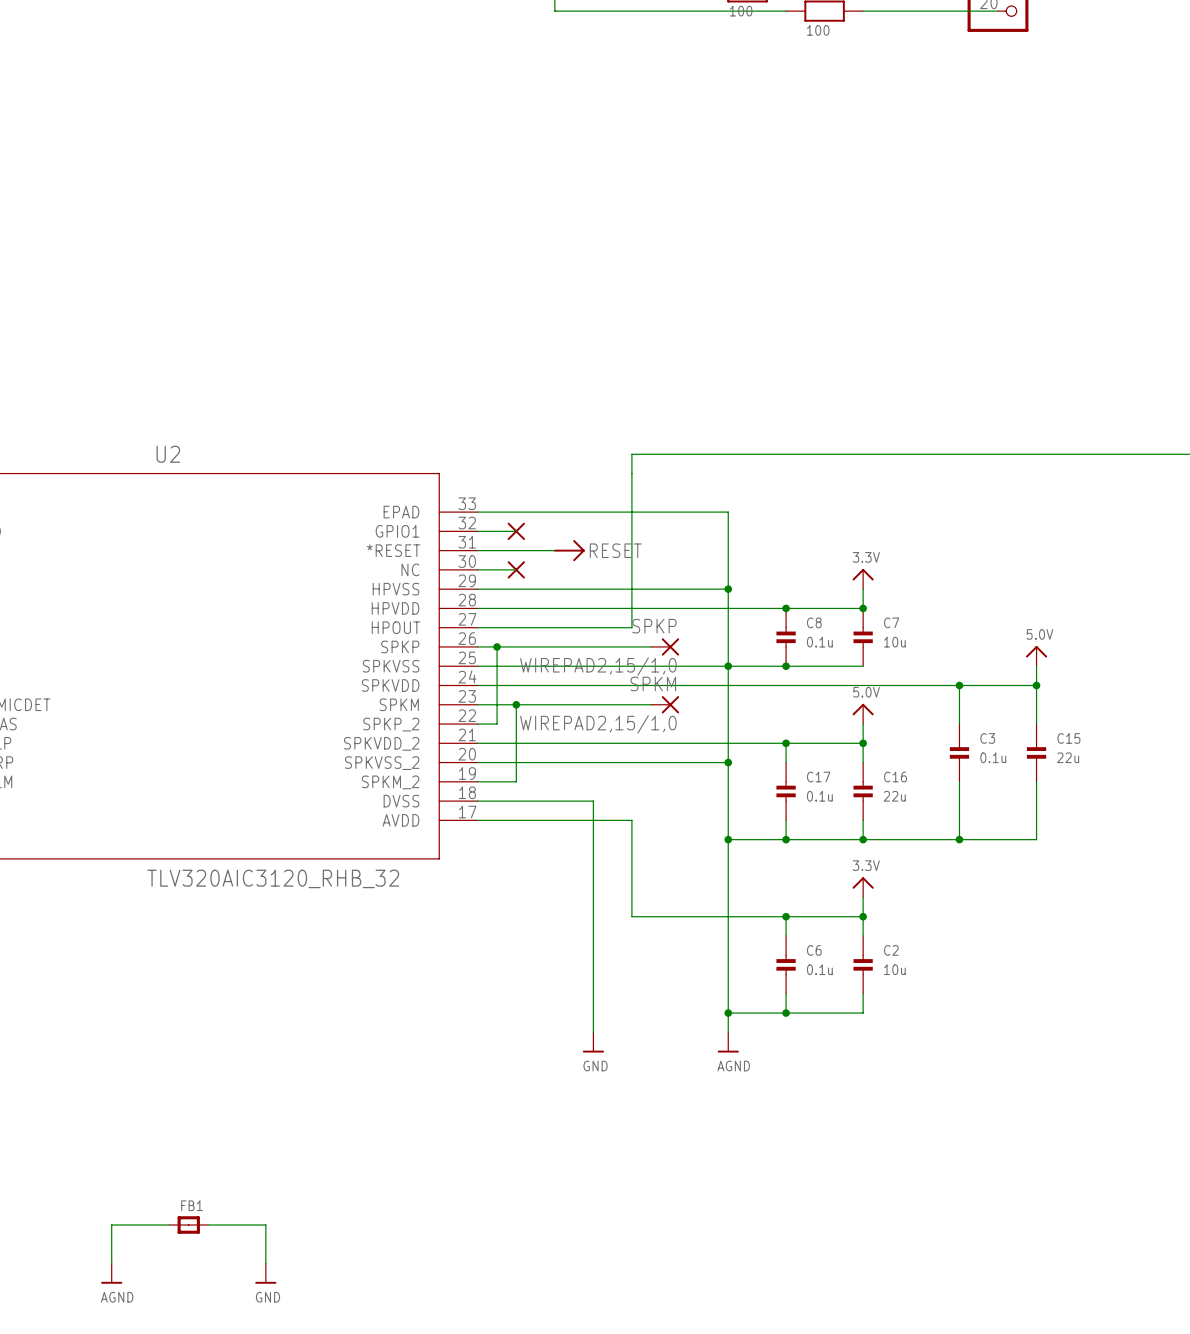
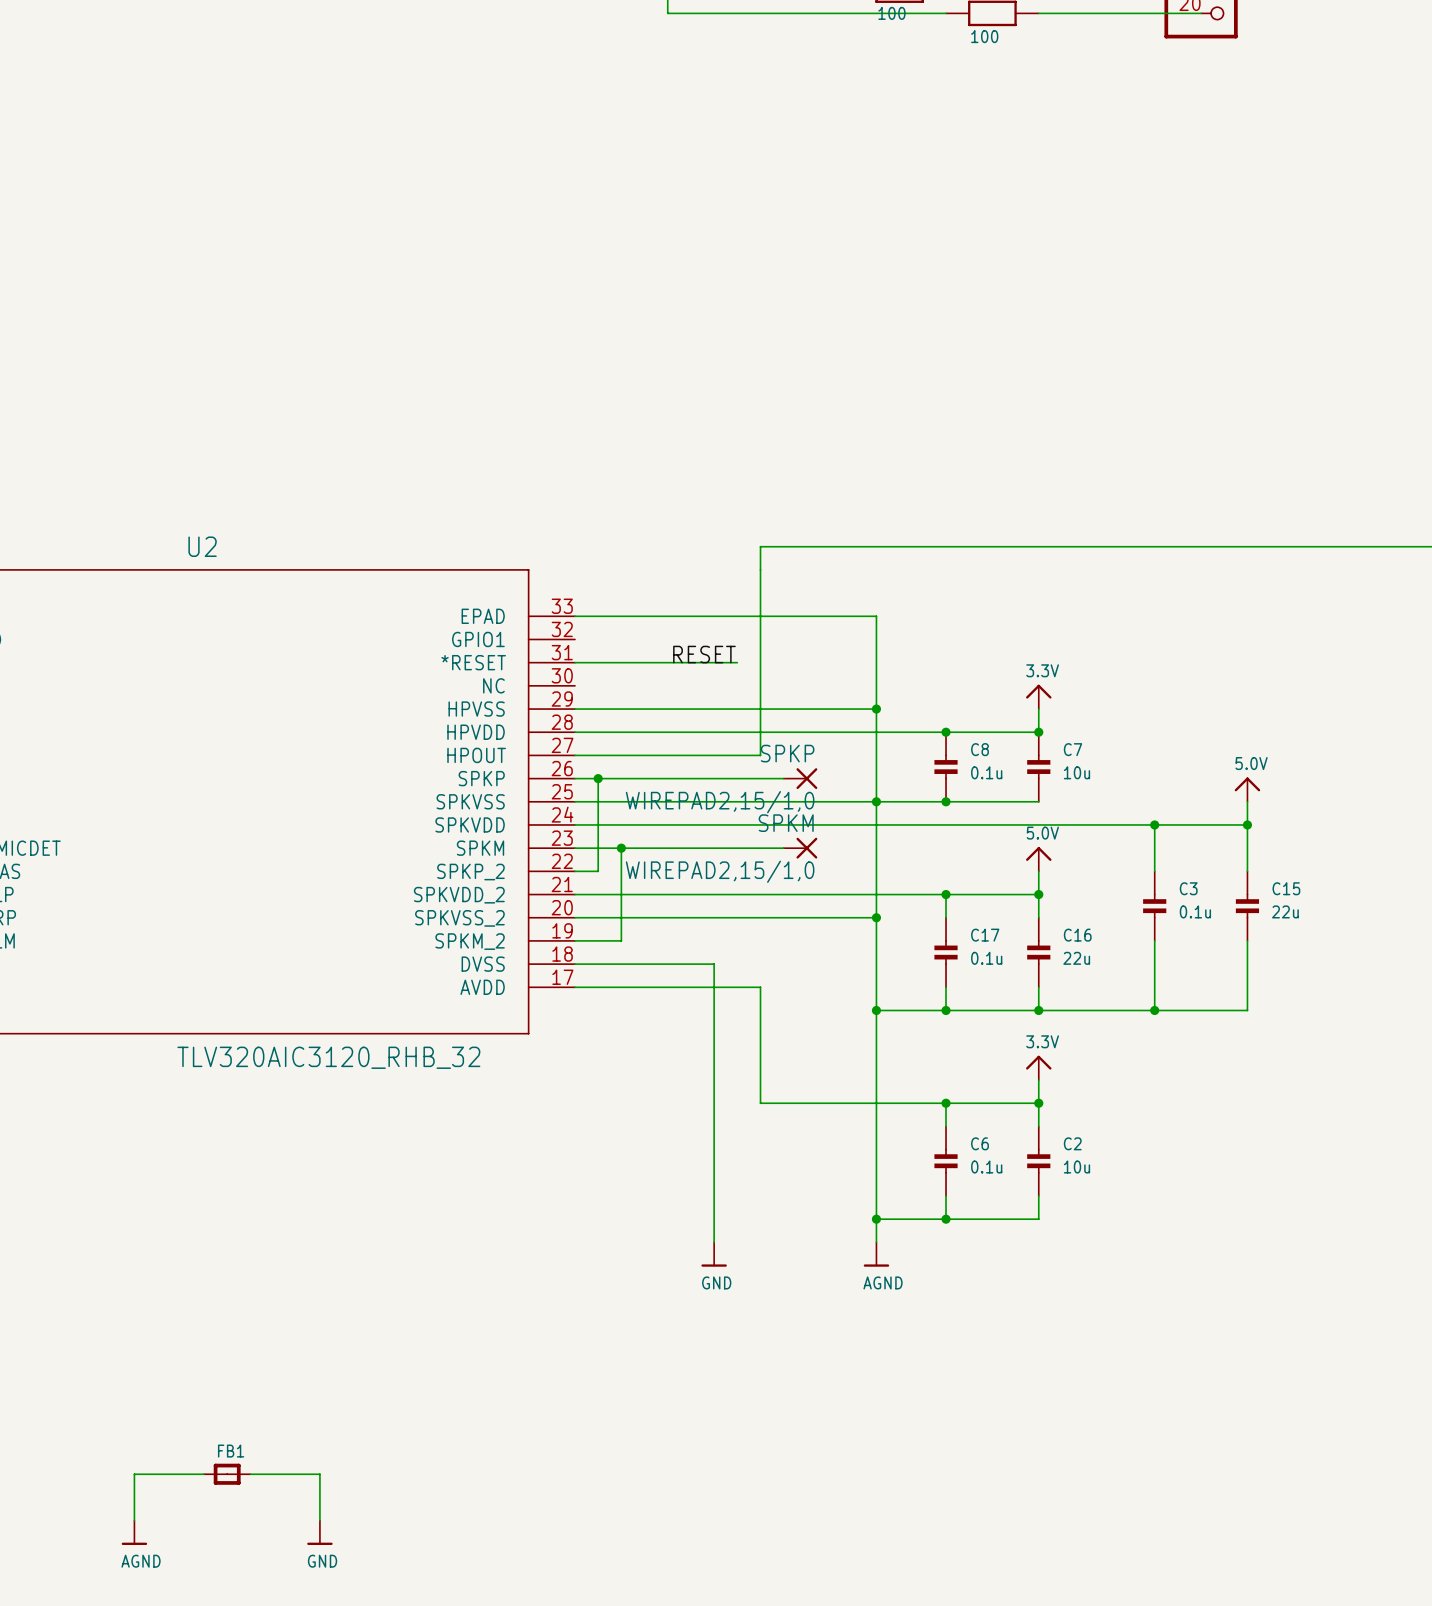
wire: (477, 531) (516, 531) -> none
power symbol: (516, 531) -> none
label: none -> RESET (704, 654)
power symbol: RESET (569, 550) -> none
wire: (477, 569) (516, 569) -> none
power symbol: (516, 569) -> none

